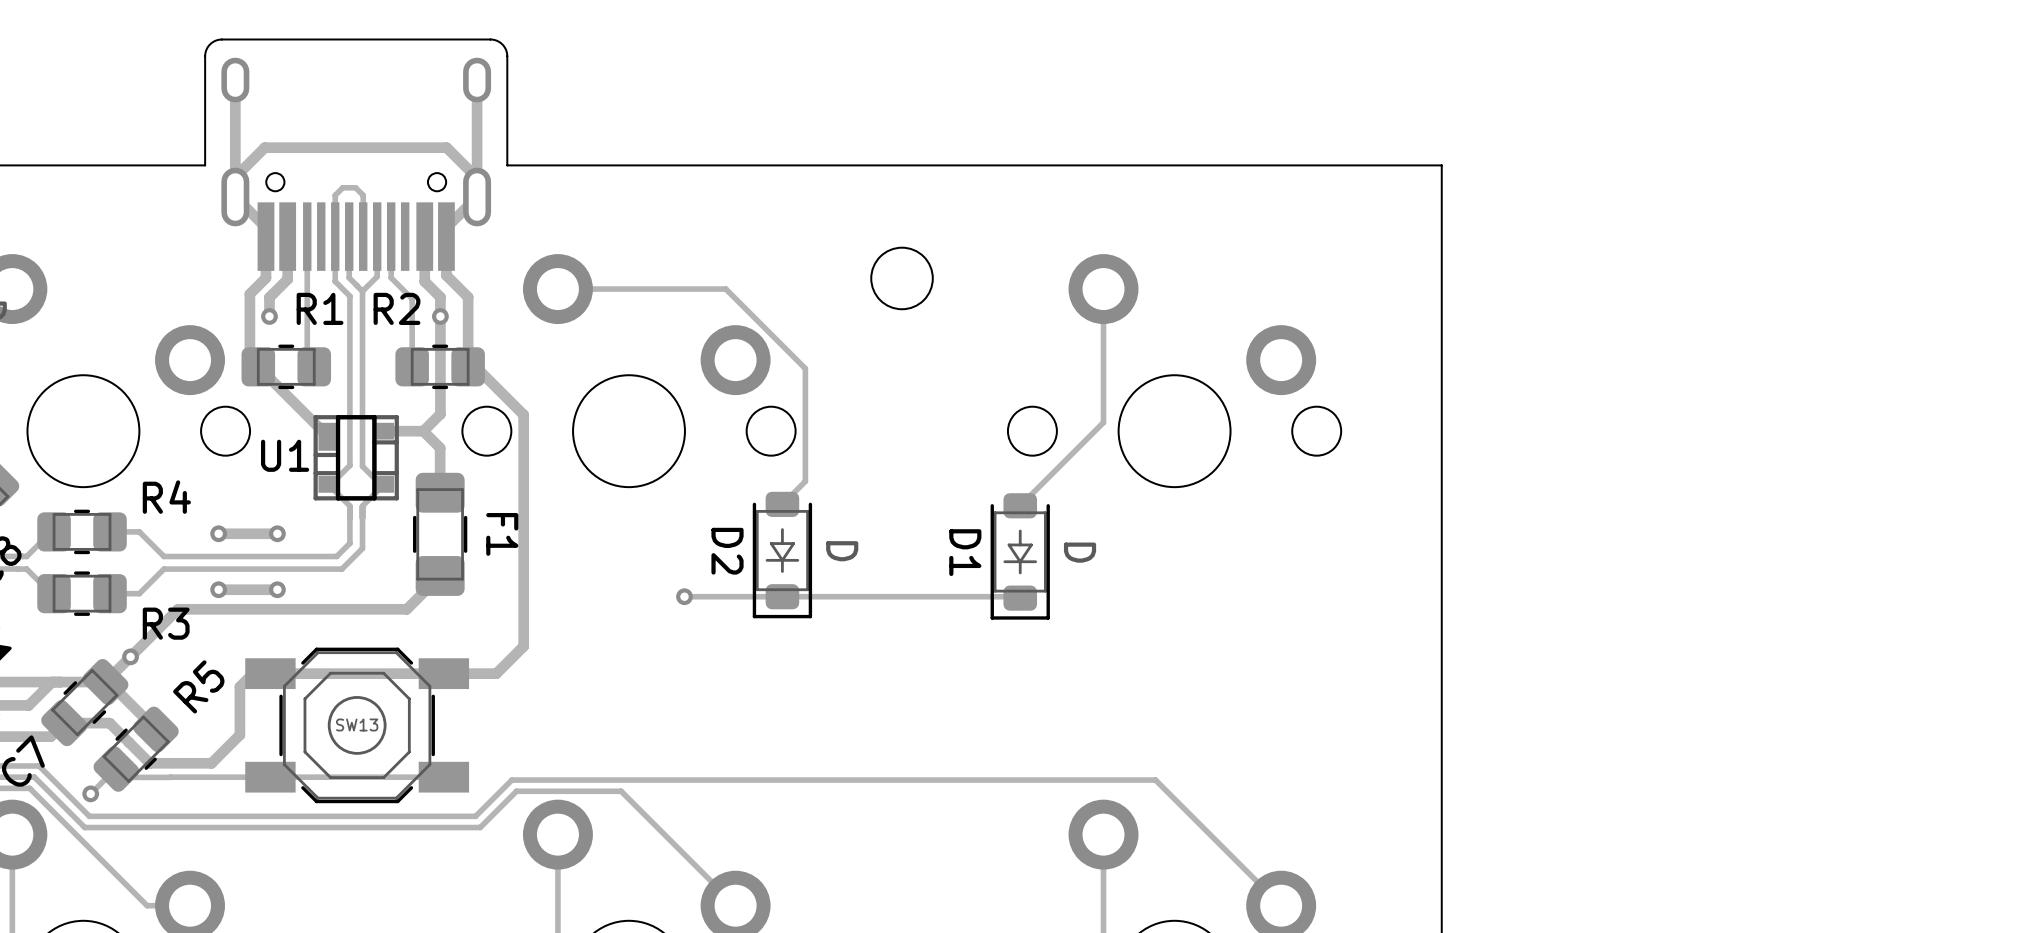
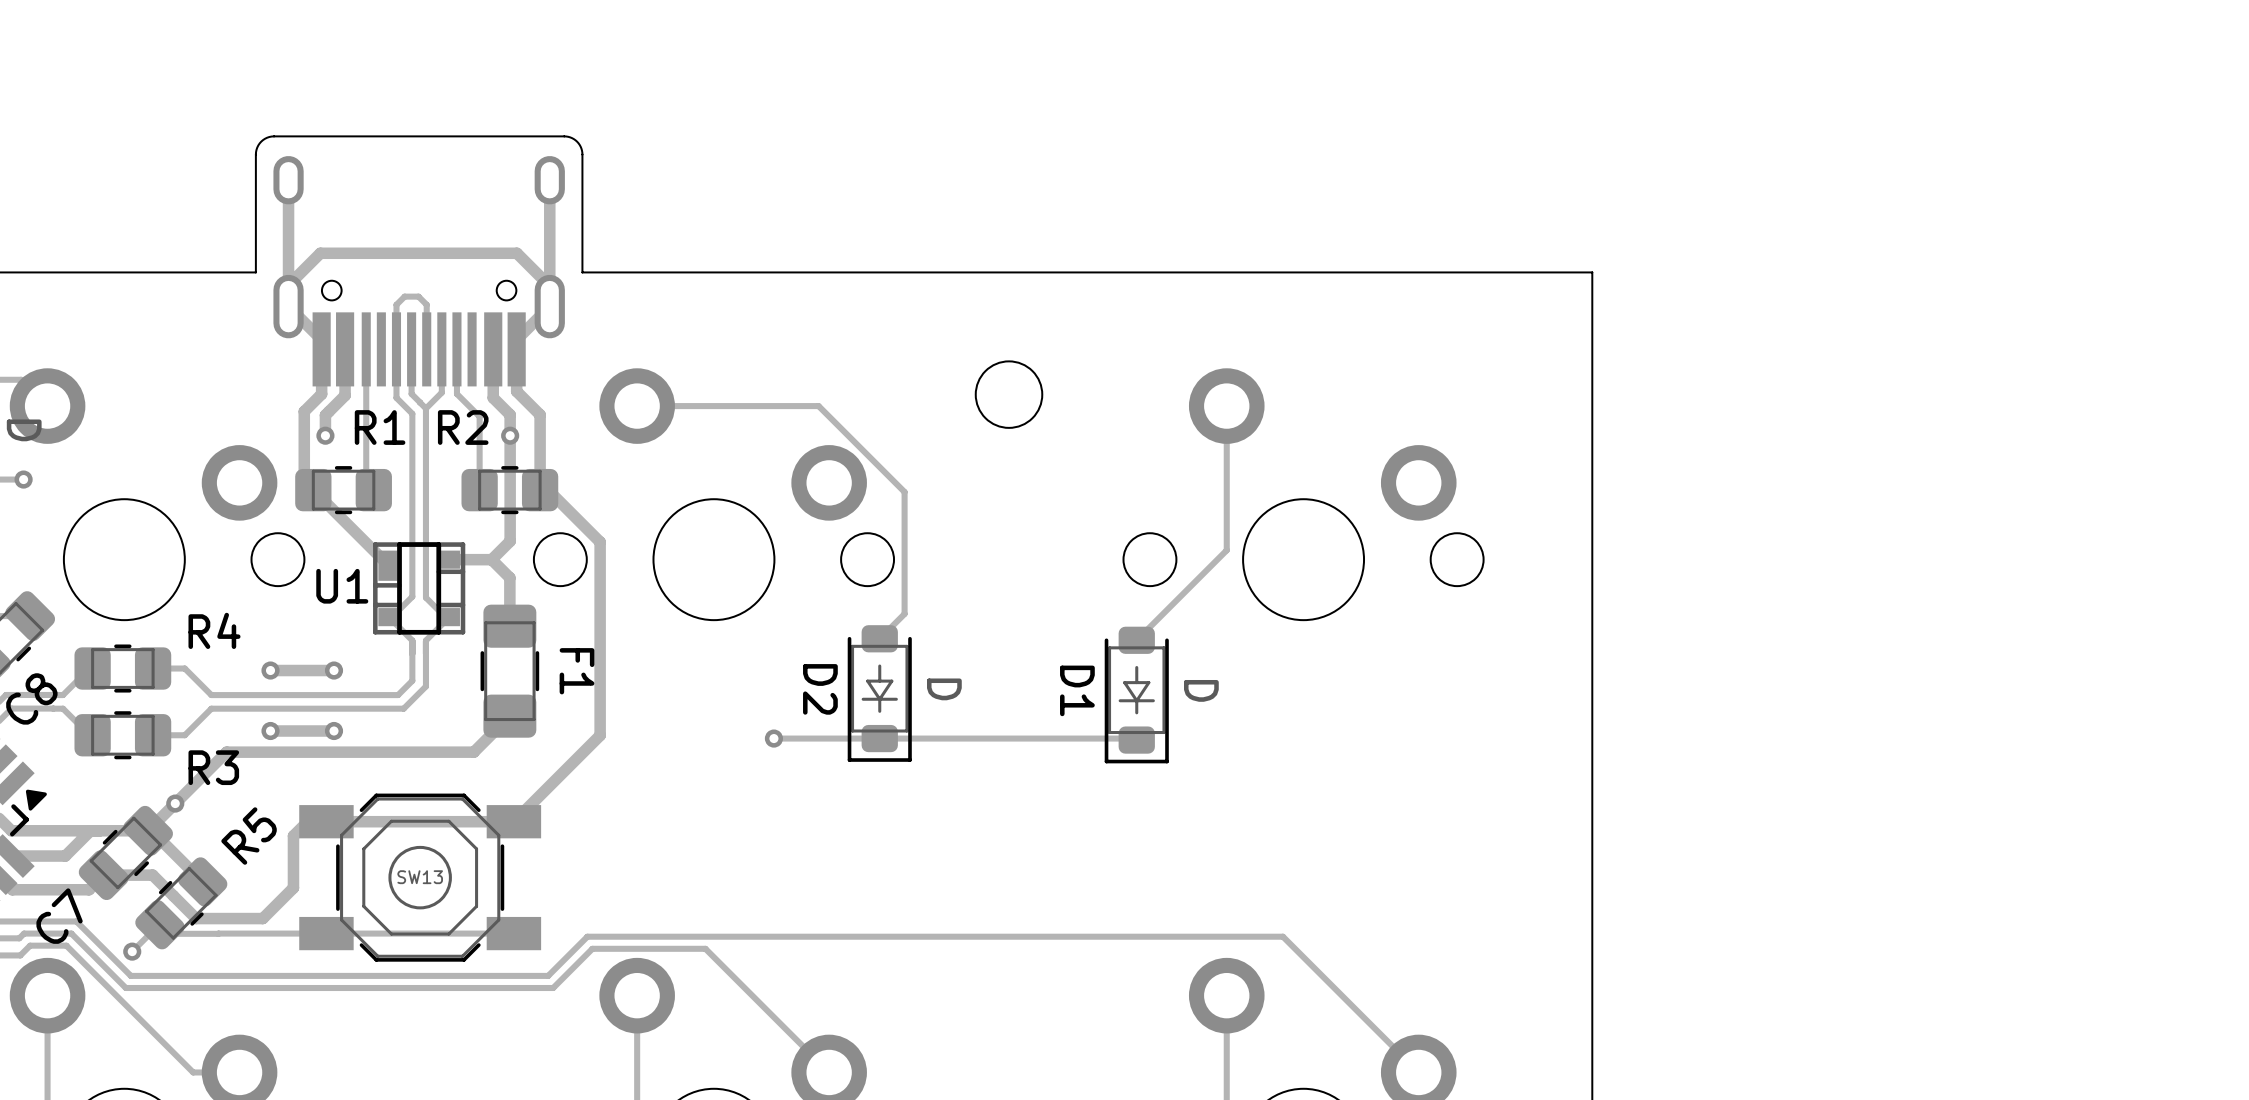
track: (523, 593) (523, 646) (496, 673) (443, 673) -> (600, 735) (513, 821)

